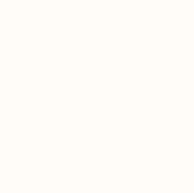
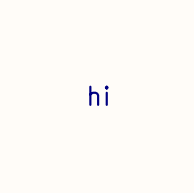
text: none -> hi (98, 95)

